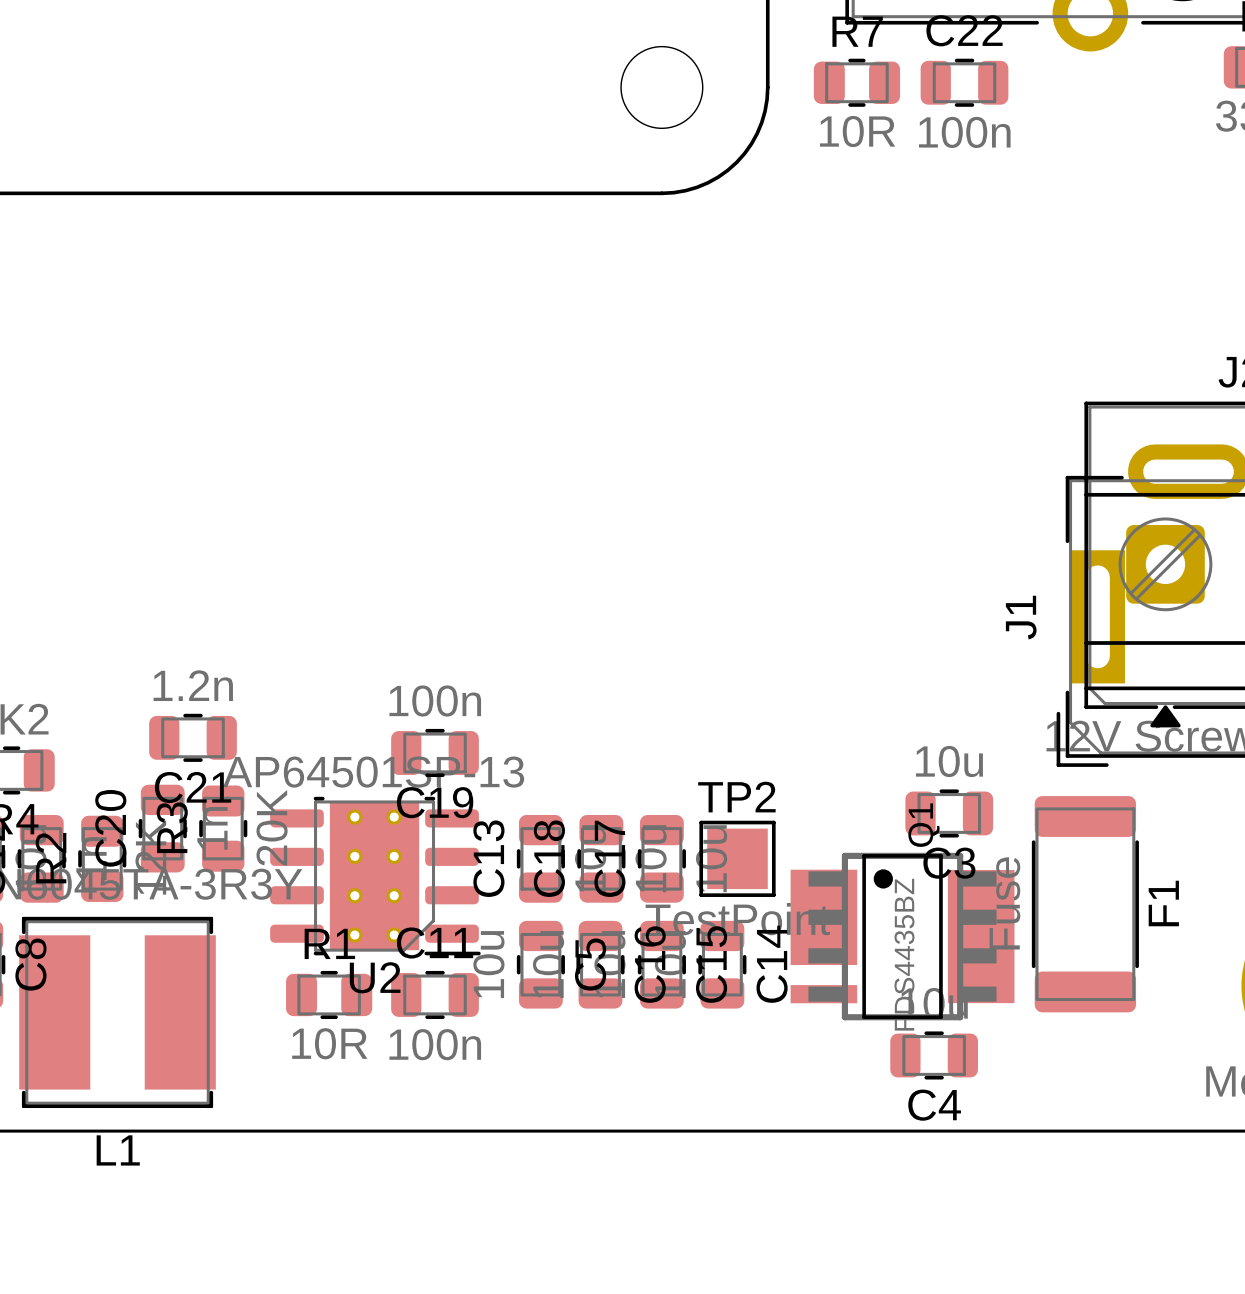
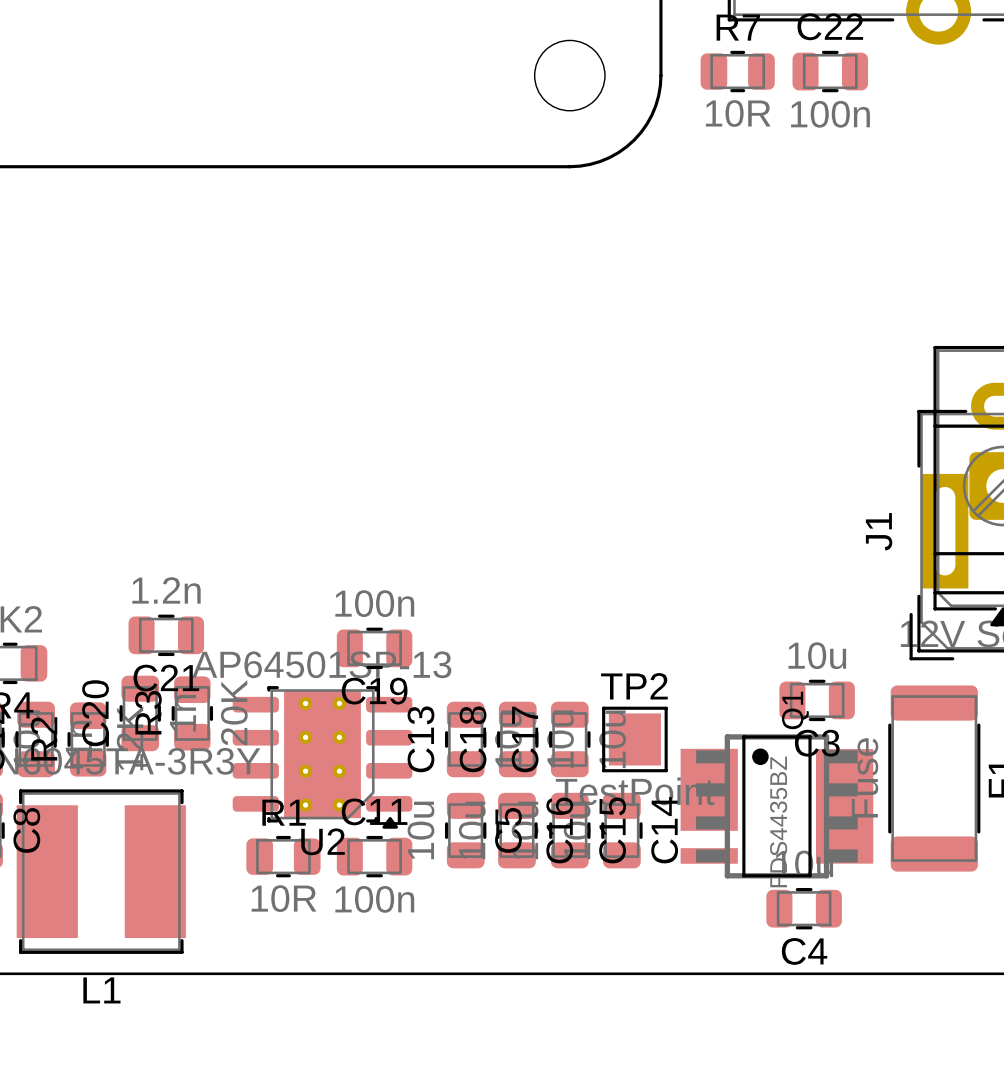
U2 footprint: [270, 796, 481, 956] -> [232, 686, 413, 829]

